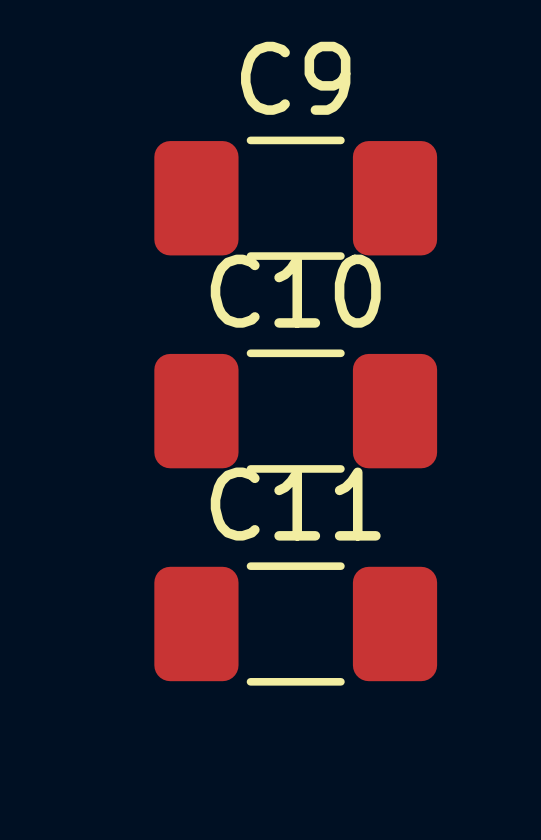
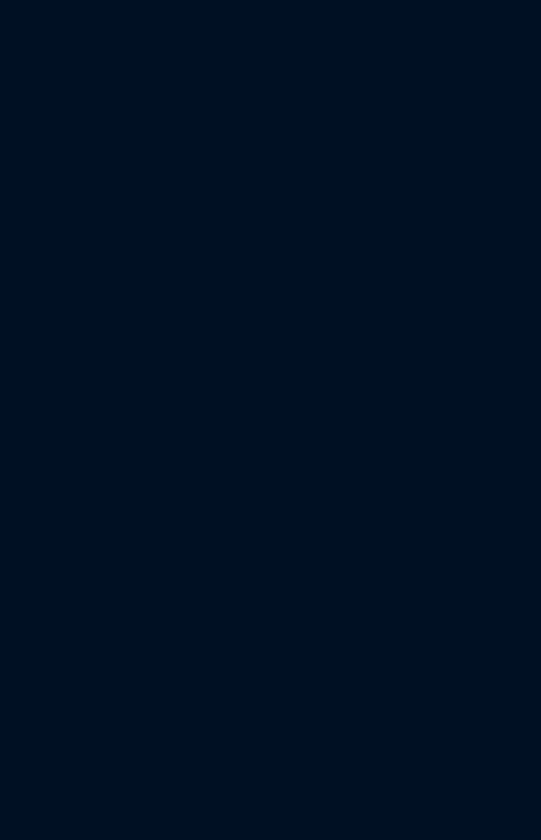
C9: (295, 198) -> none
C10: (295, 411) -> none
C11: (295, 623) -> none

